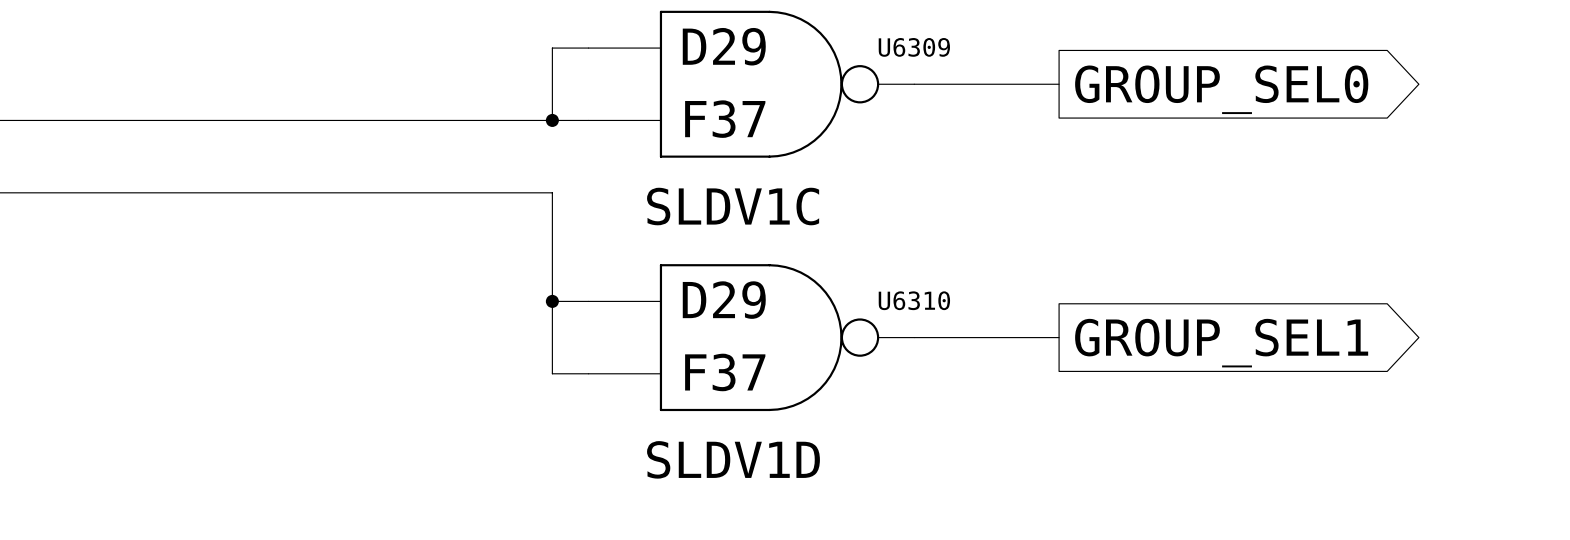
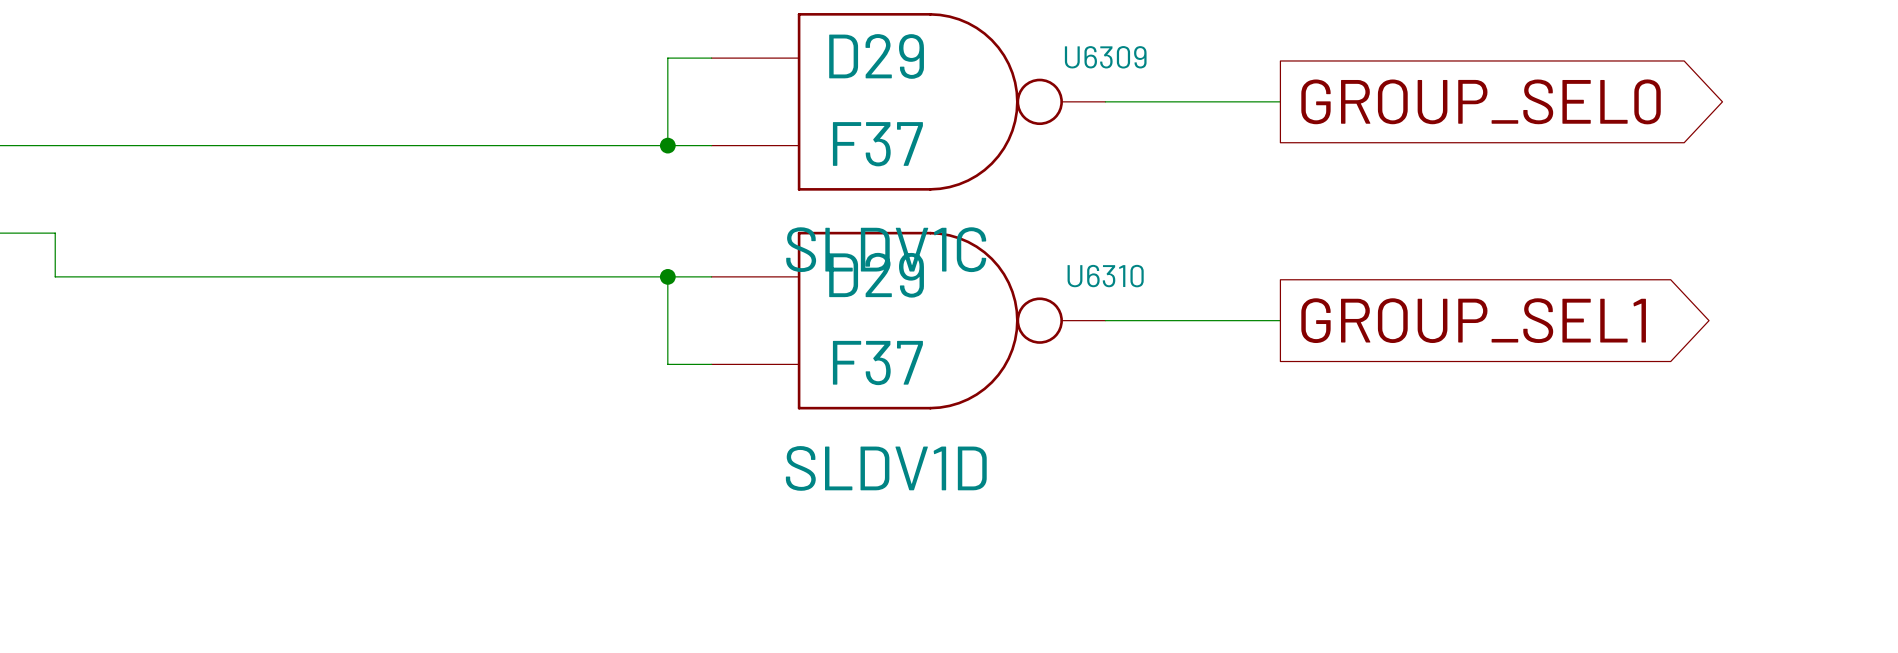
wire: (45, 192) (552, 192) (552, 229) -> (55, 233) (55, 276) (711, 276)
wire: (552, 301) (552, 373) (588, 373) -> none
junction position: (552, 301) -> (667, 276)
U6310 position: (751, 337) -> (908, 320)
wire: (914, 337) (1059, 337) -> (1105, 320) (1280, 320)
global label position: GROUP_SEL1 (1221, 343) -> GROUP_SEL1 (1473, 320)

